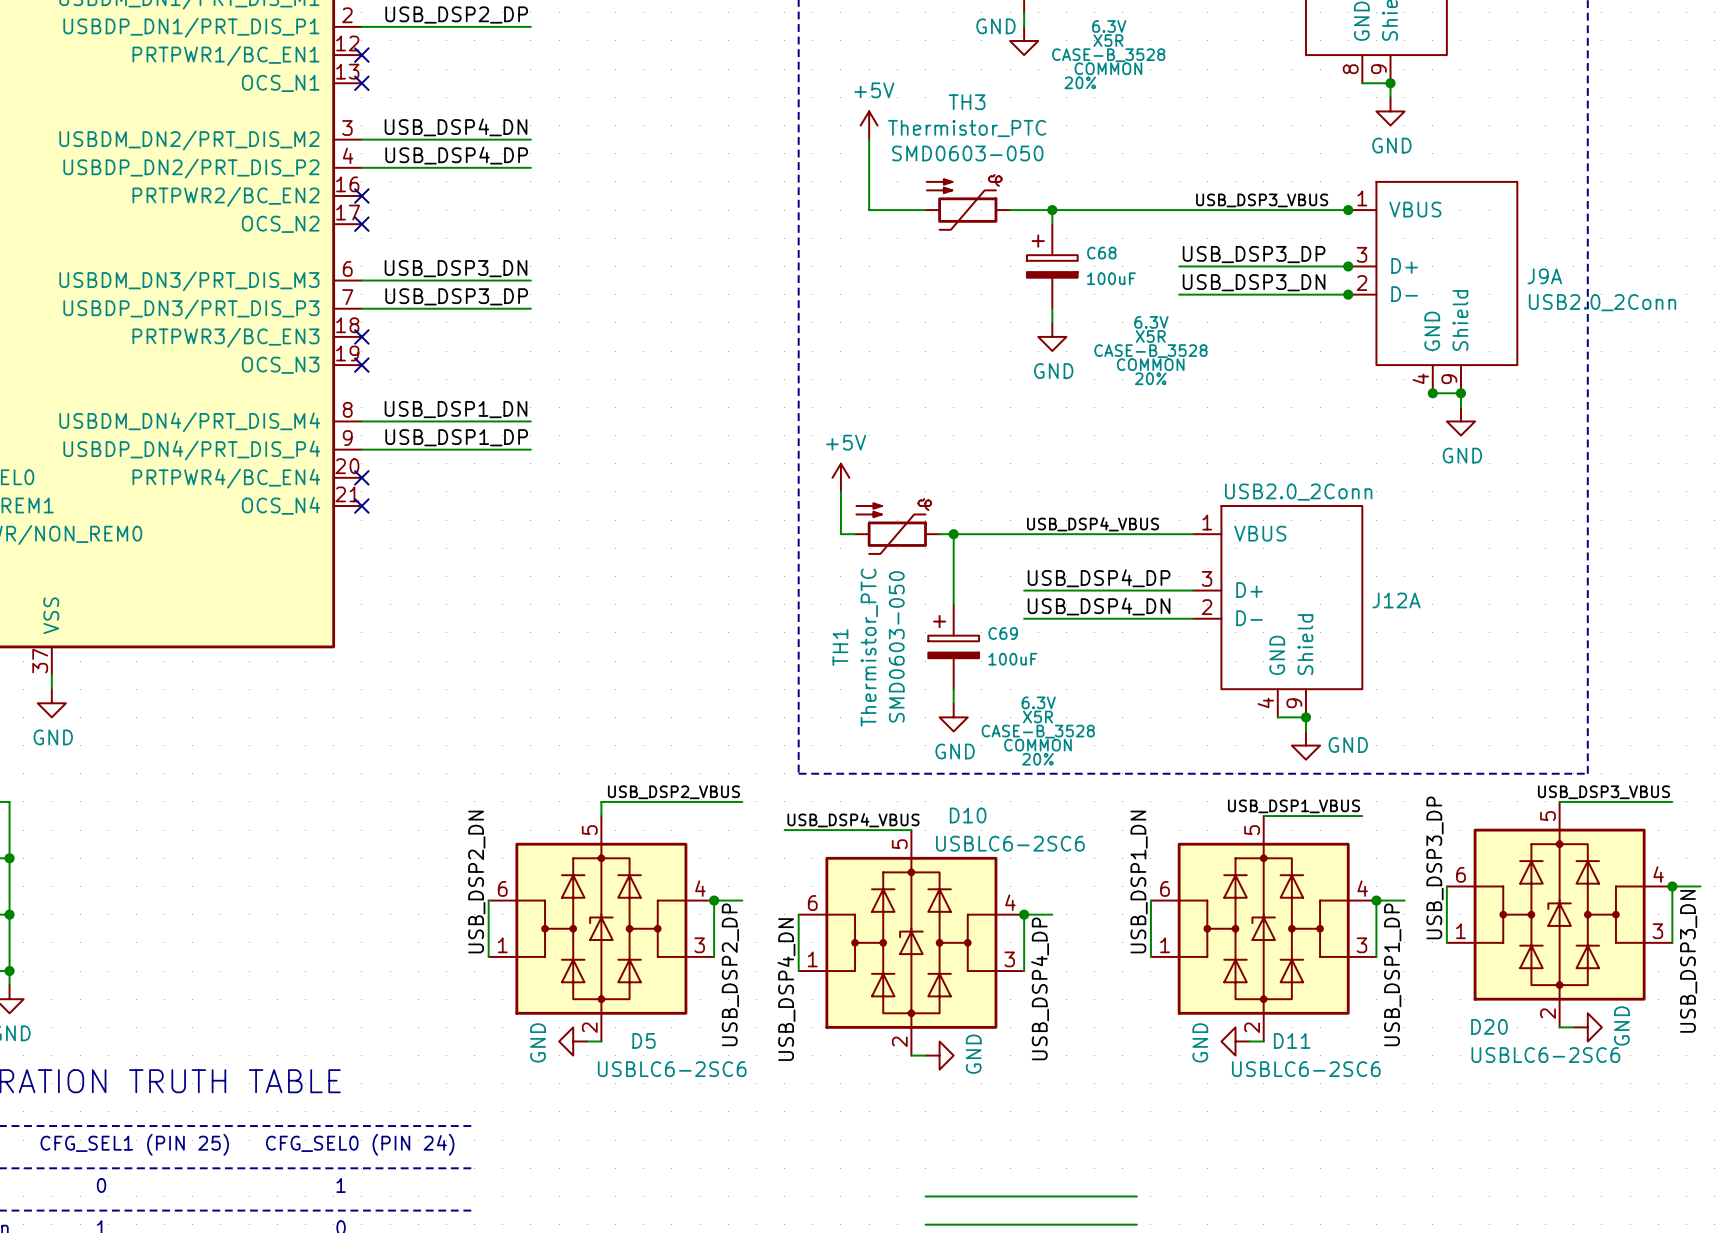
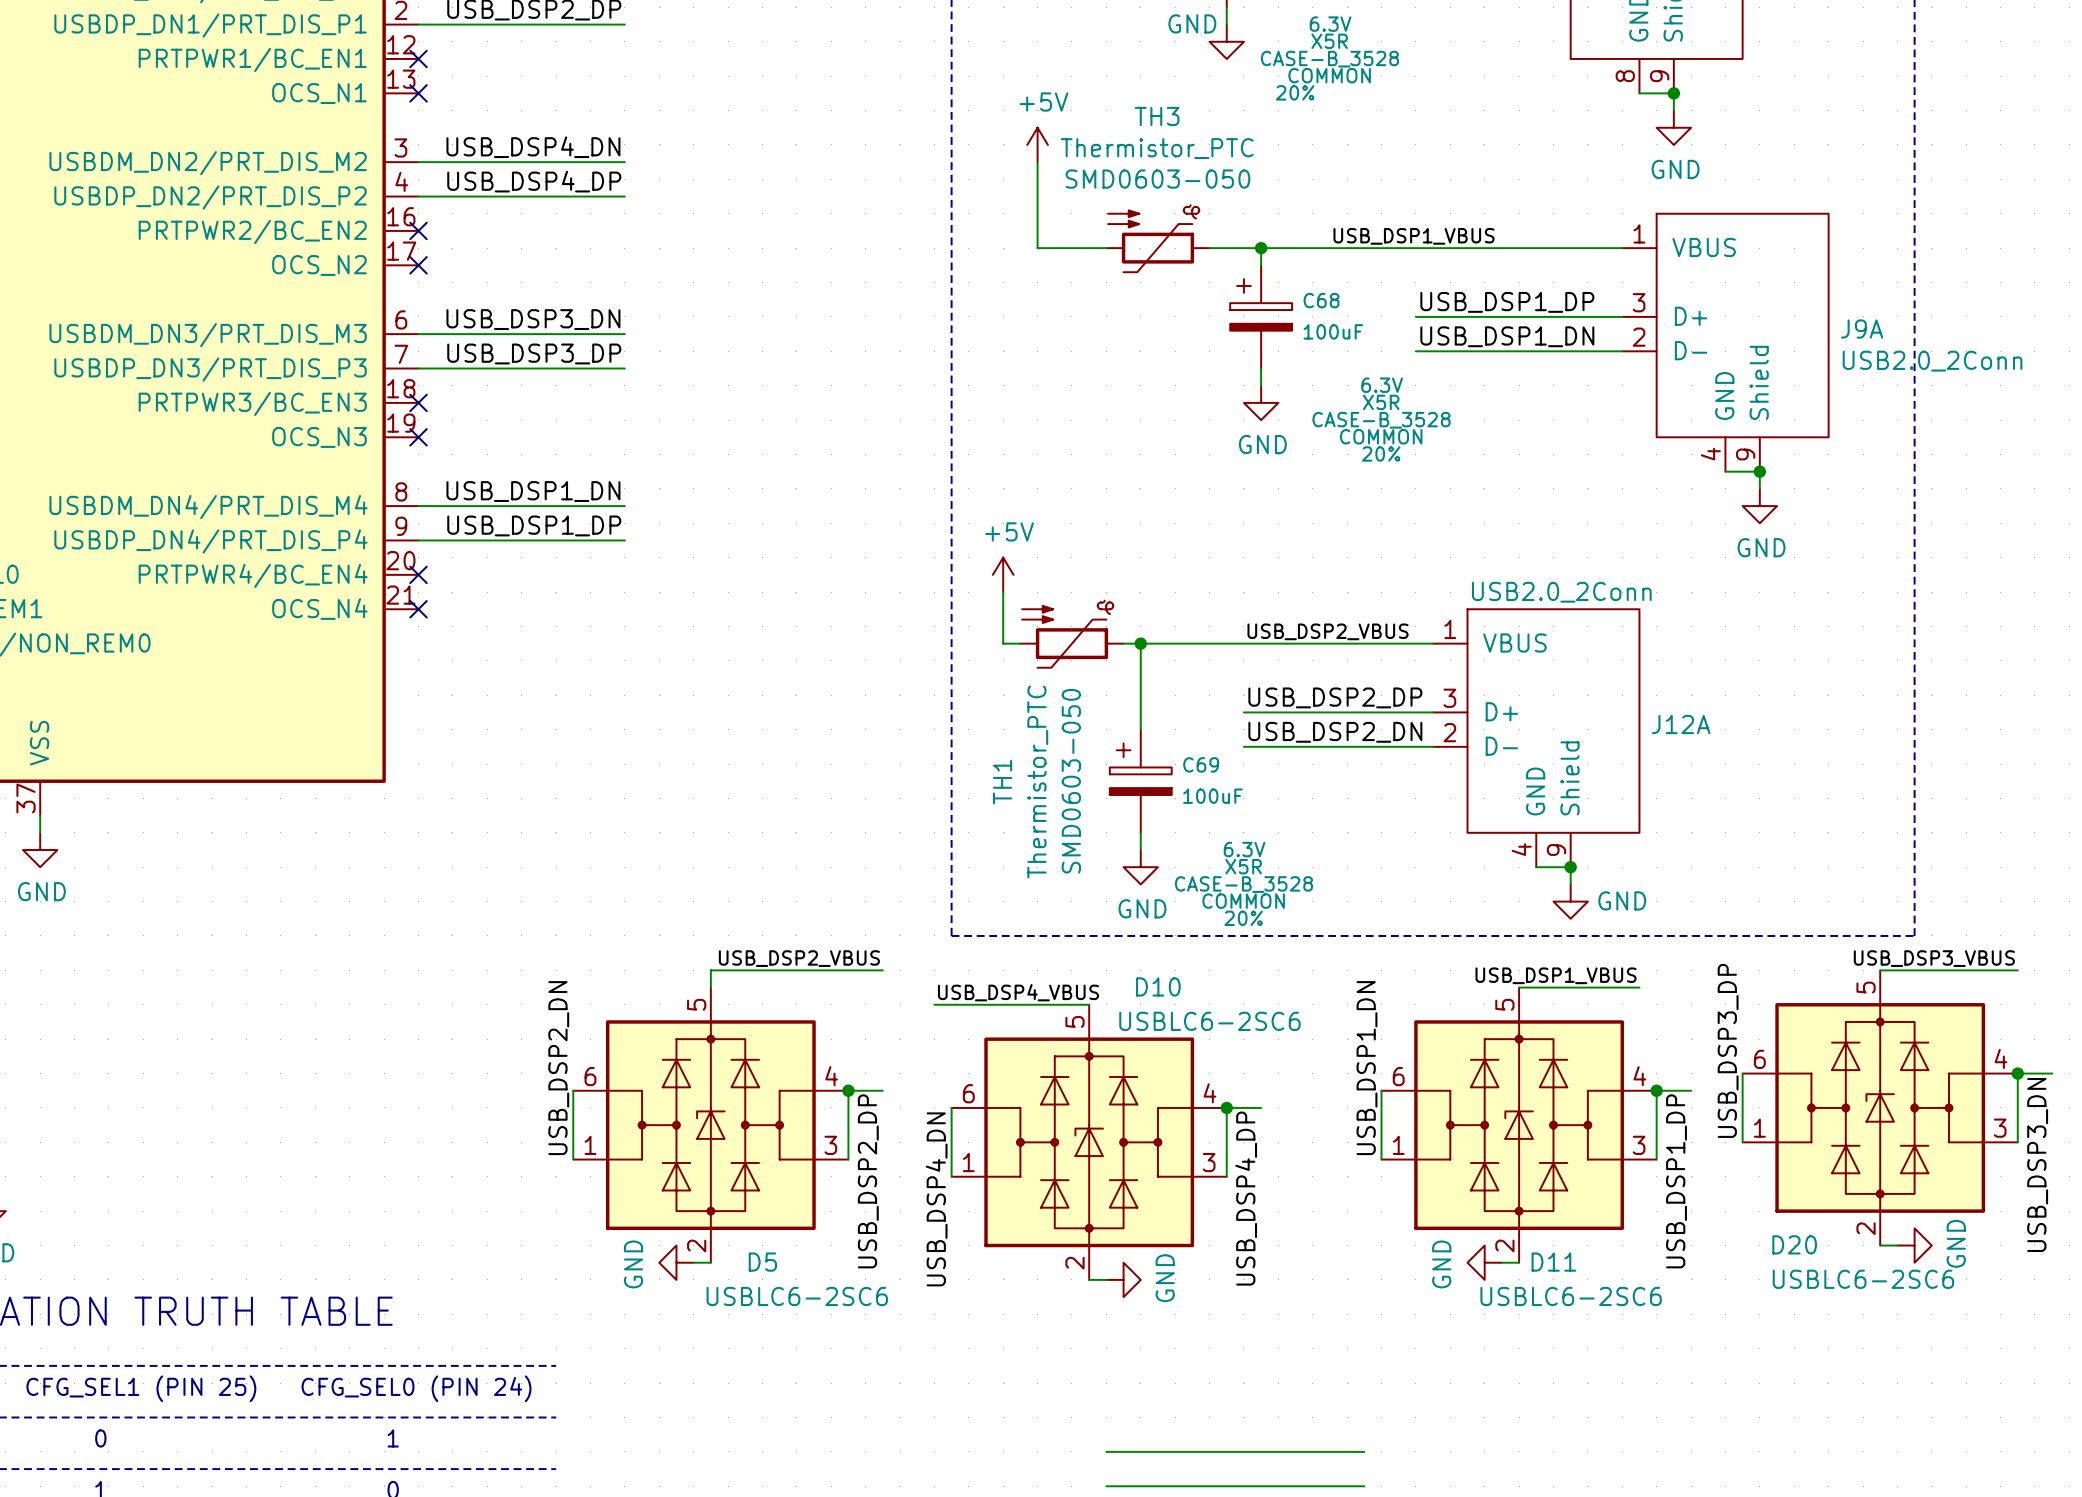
label: USB_DSP3_VBUS (1262, 200) -> USB_DSP1_VBUS (1414, 236)
junction: (1348, 210) -> none
label: USB_DSP3_DP (1254, 254) -> USB_DSP1_DP (1507, 302)
junction: (1348, 266) -> none
label: USB_DSP3_DN (1254, 282) -> USB_DSP1_DN (1507, 336)
junction: (1348, 294) -> none
junction: (1432, 393) -> none
label: USB_DSP4_VBUS (1093, 524) -> USB_DSP2_VBUS (1328, 631)
label: USB_DSP4_DP (1099, 578) -> USB_DSP2_DP (1335, 697)
wire: (1024, 590) (1038, 590) -> none
label: USB_DSP4_DN (1099, 606) -> USB_DSP2_DN (1335, 732)
wire: (1024, 618) (1038, 618) -> none

